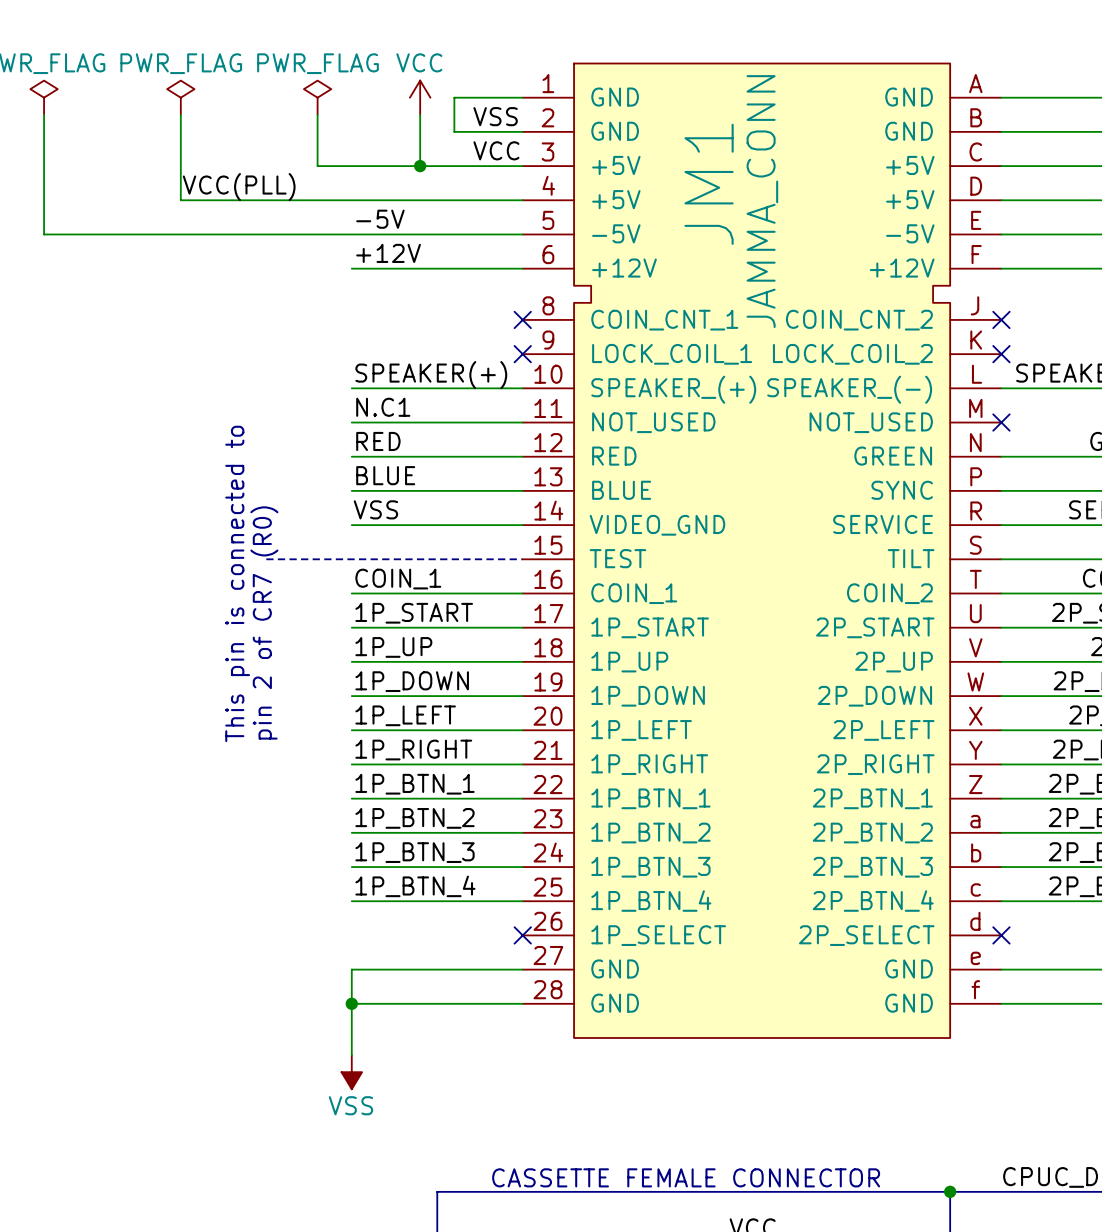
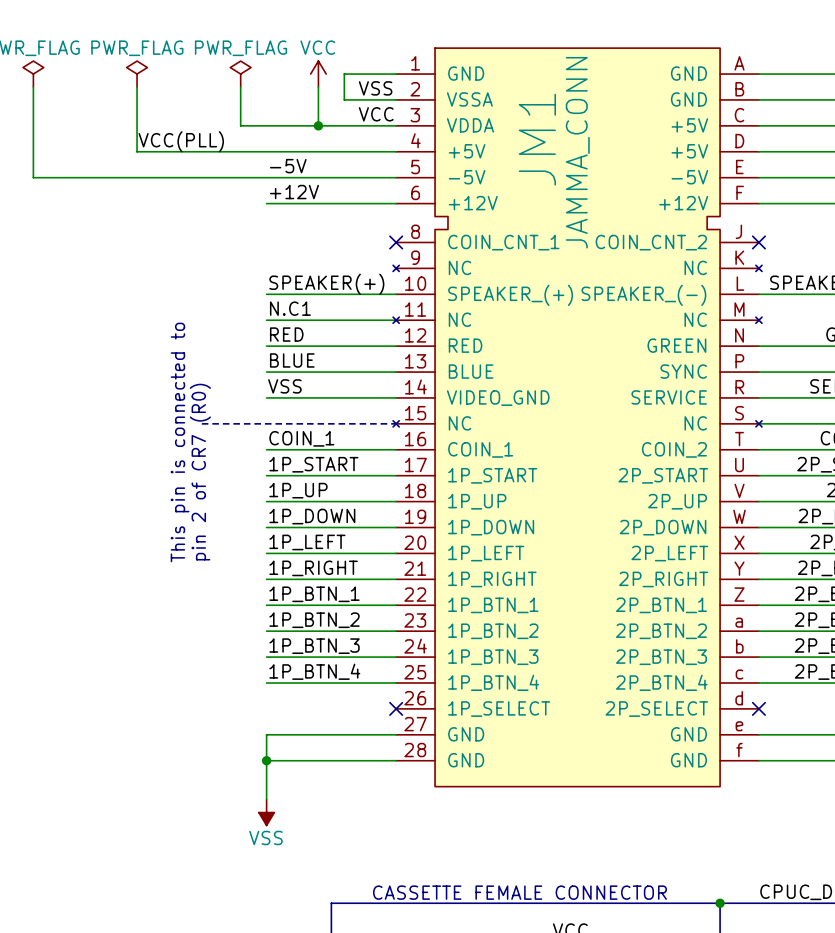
JM1 symbol: [522, 63, 1002, 1039] -> [393, 48, 763, 787]
no-connect mark: (522, 354) -> none
no-connect mark: (1001, 354) -> none
no-connect mark: (1001, 422) -> none

